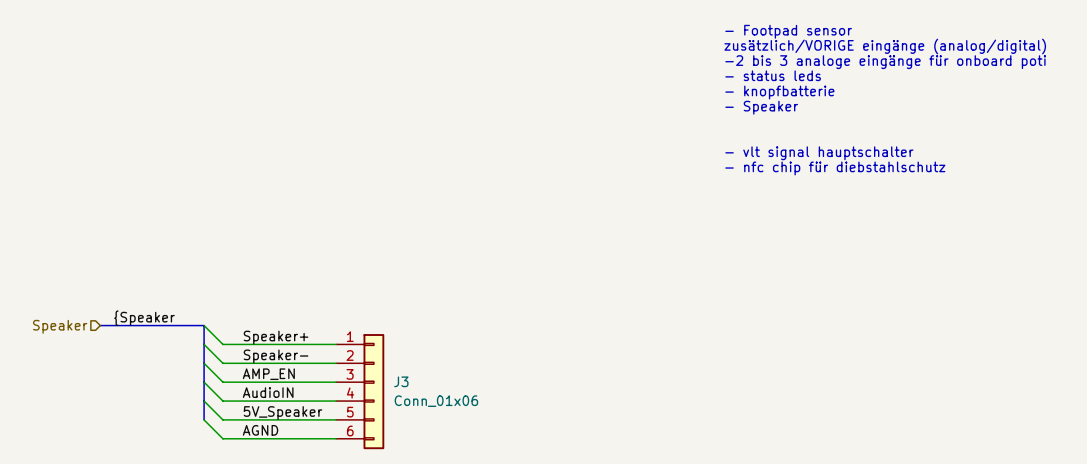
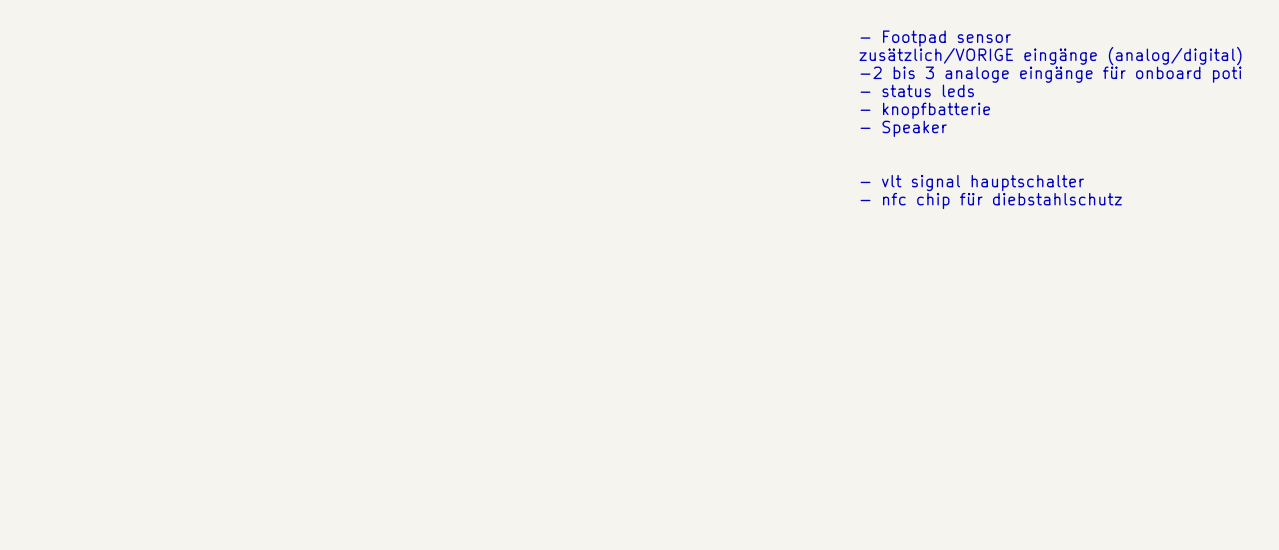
label: {Speaker (144, 318) -> none
bus: (100, 325) (204, 325) (204, 419) -> none
wire: (204, 325) (222, 344) (336, 344) -> none
hierarchical label: Speaker (60, 326) -> none
label: Speaker+ (276, 337) -> none
wire: (204, 344) (222, 363) (336, 363) -> none
label: Speaker- (276, 356) -> none
wire: (204, 363) (222, 382) (336, 382) -> none
label: AMP_EN (268, 374) -> none
wire: (204, 382) (222, 401) (336, 401) -> none
J3: Conn_01x06 (360, 391) -> none
label: AudioIN (268, 392) -> none
wire: (204, 401) (222, 419) (336, 419) -> none
label: 5V_Speaker (282, 413) -> none
wire: (204, 419) (222, 438) (336, 438) -> none
label: AGND (260, 430) -> none

